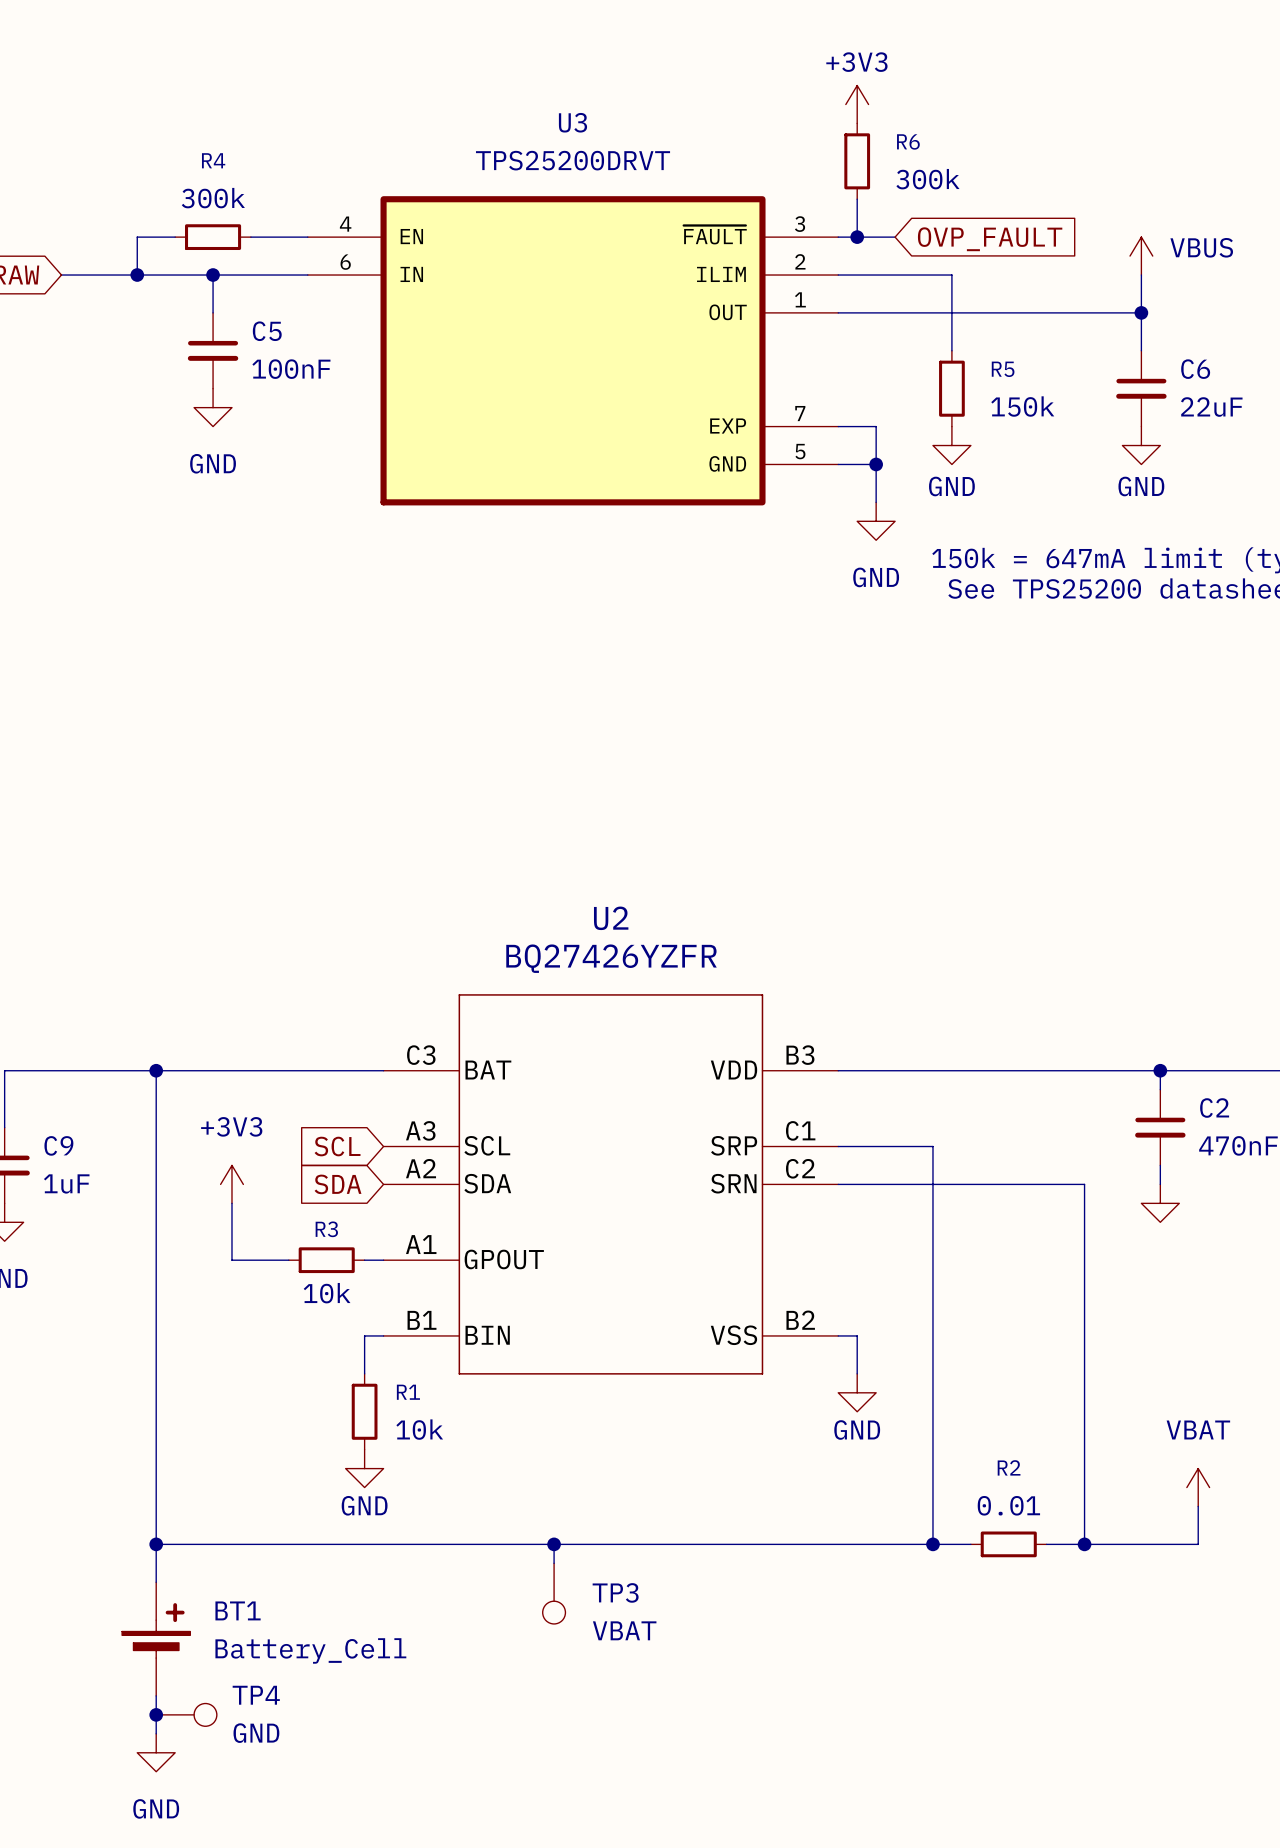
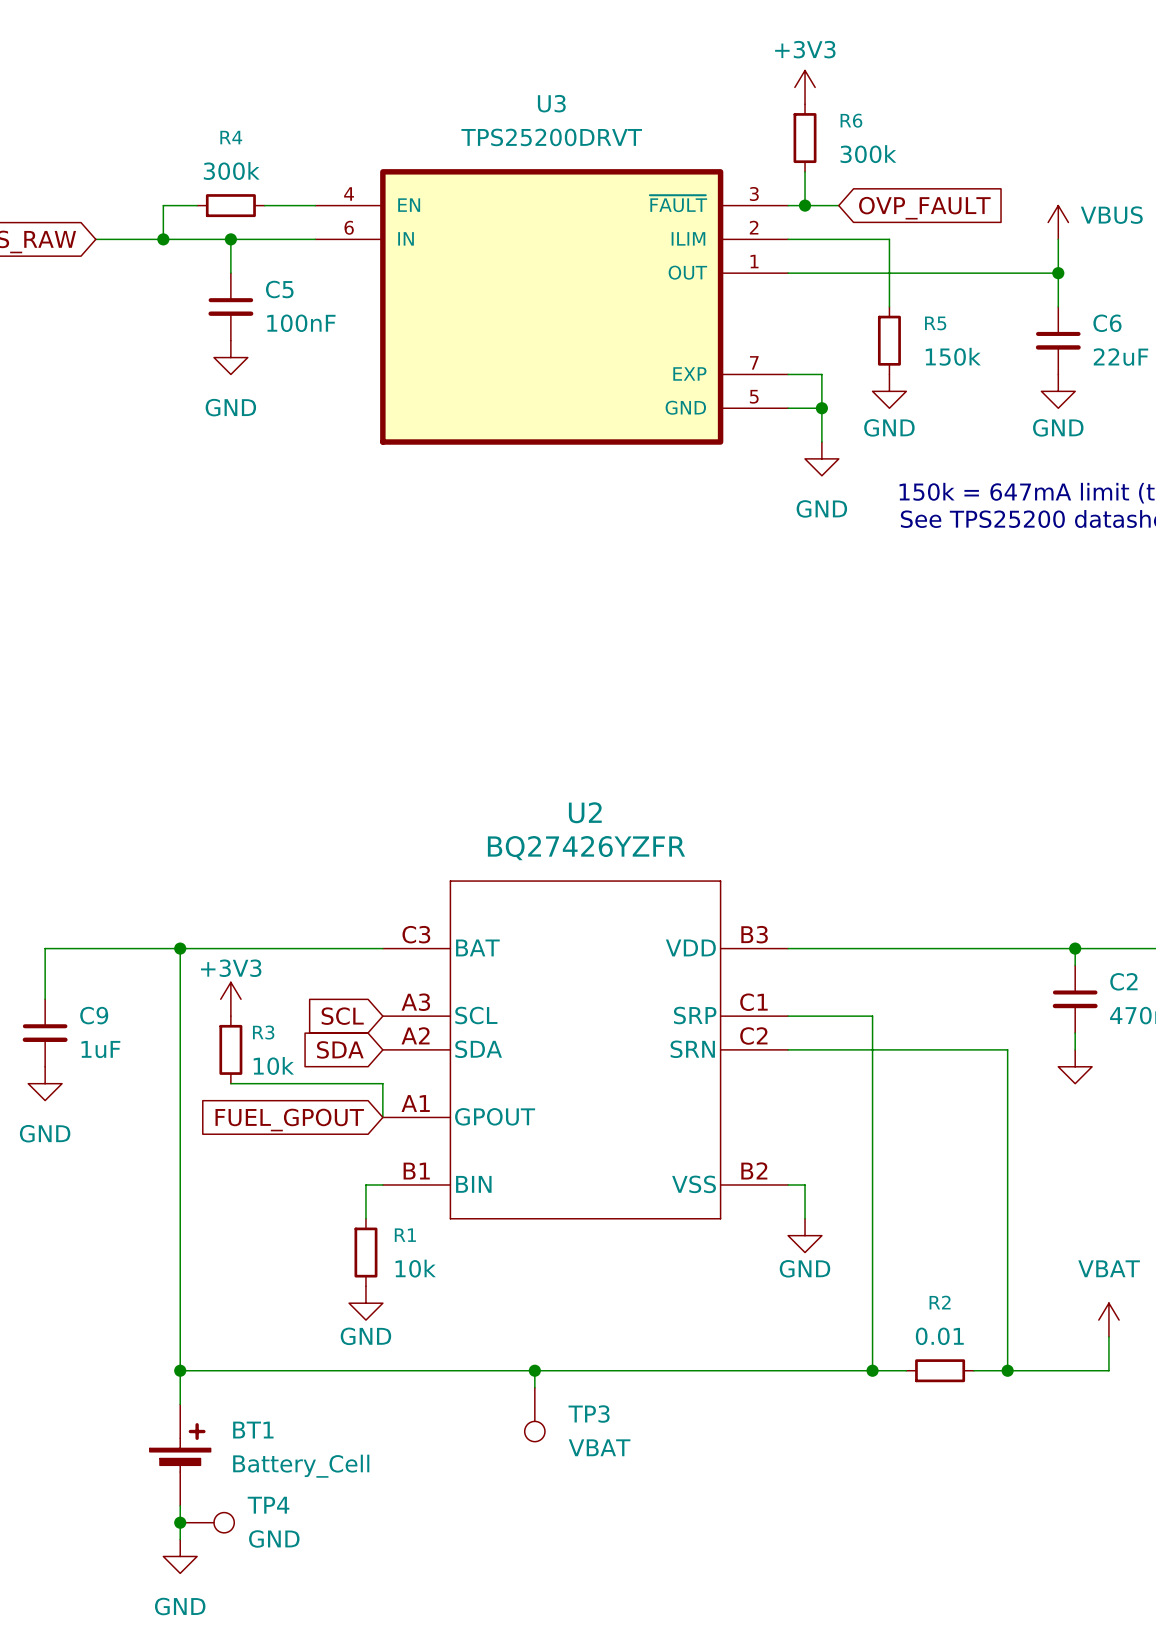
power symbol text position: +3V3 (231, 1126) -> +3V3 (231, 968)
power symbol position: +3V3 (231, 1184) -> +3V3 (230, 999)
wire: (231, 1203) (231, 1260) (288, 1260) -> none
R3 rotation: 0° (326, 1260) -> 90° clockwise (230, 1049)
R3 position: (326, 1260) -> (230, 1049)
wire: (364, 1260) (383, 1260) -> (230, 1083) (382, 1083) (382, 1117)
global label: none -> FUEL_GPOUT (289, 1120)
R3 value position: 10k (327, 1293) -> 10k (273, 1065)

